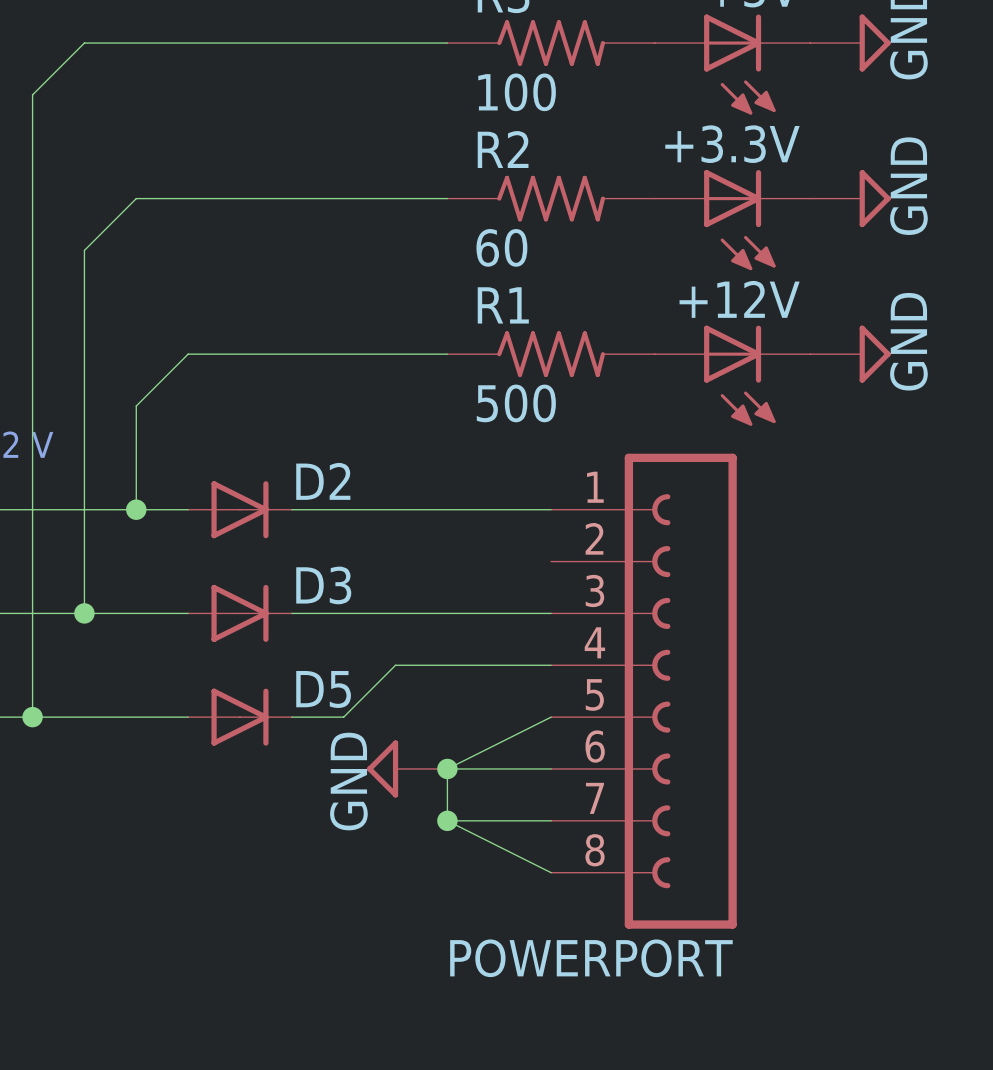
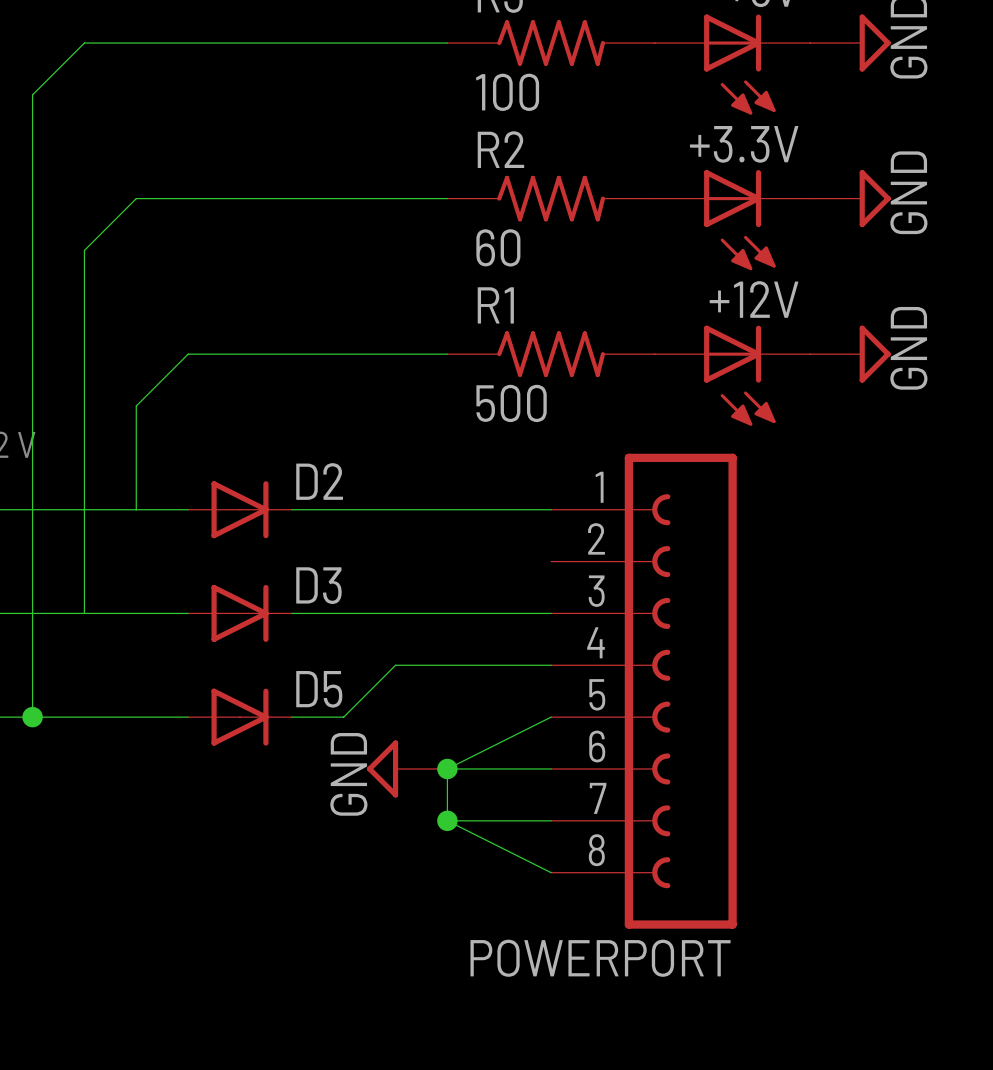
junction: (136, 509) -> none
junction: (84, 613) -> none

